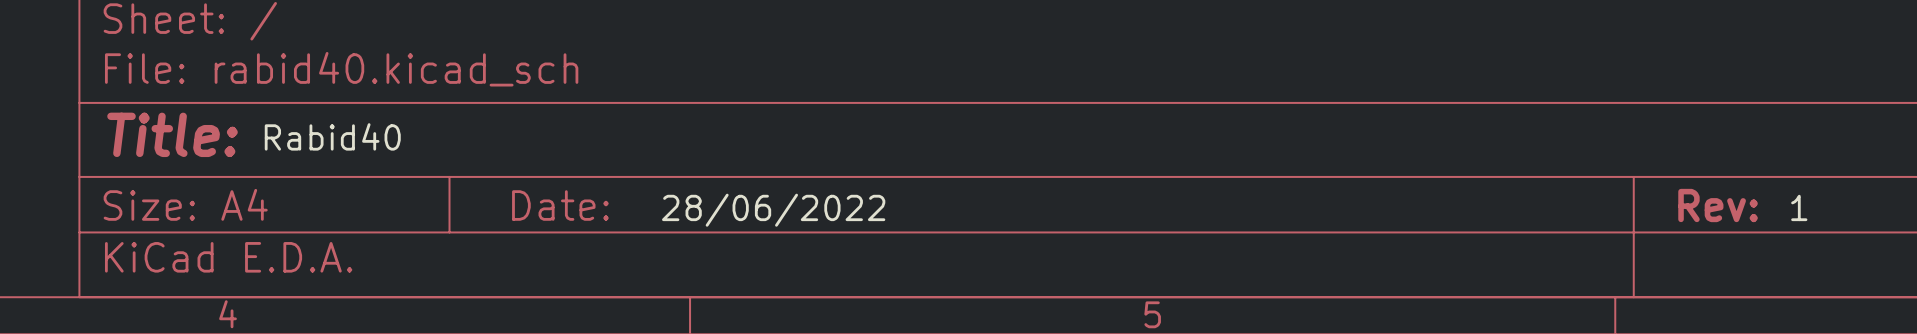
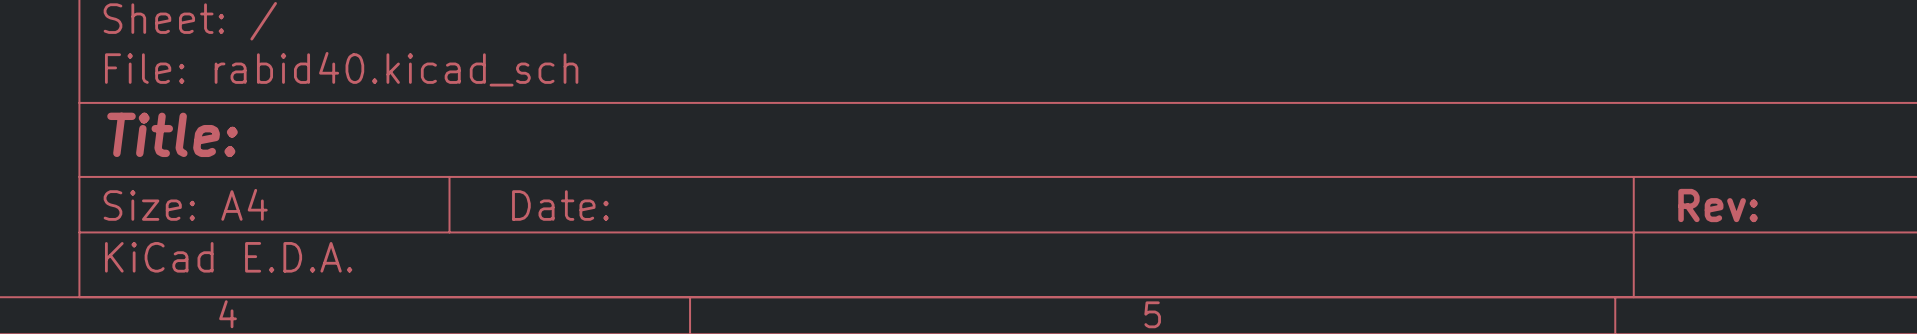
label: Rabid40 (332, 136) -> none
label: 1 (1799, 207) -> none
label: 28/06/2022 (773, 210) -> none

